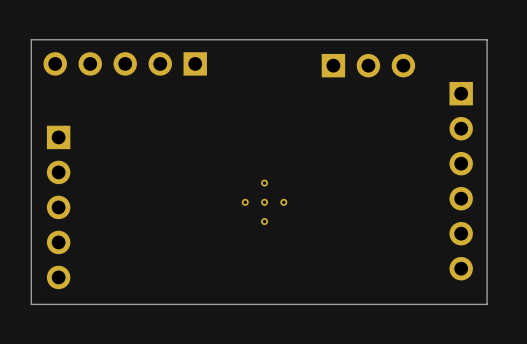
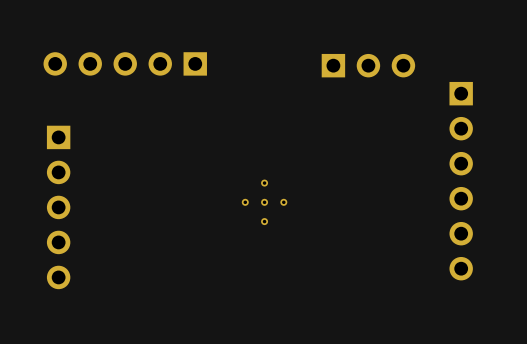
board edge: (487, 39) (31, 39) (31, 304) (487, 304) (487, 39) -> none

